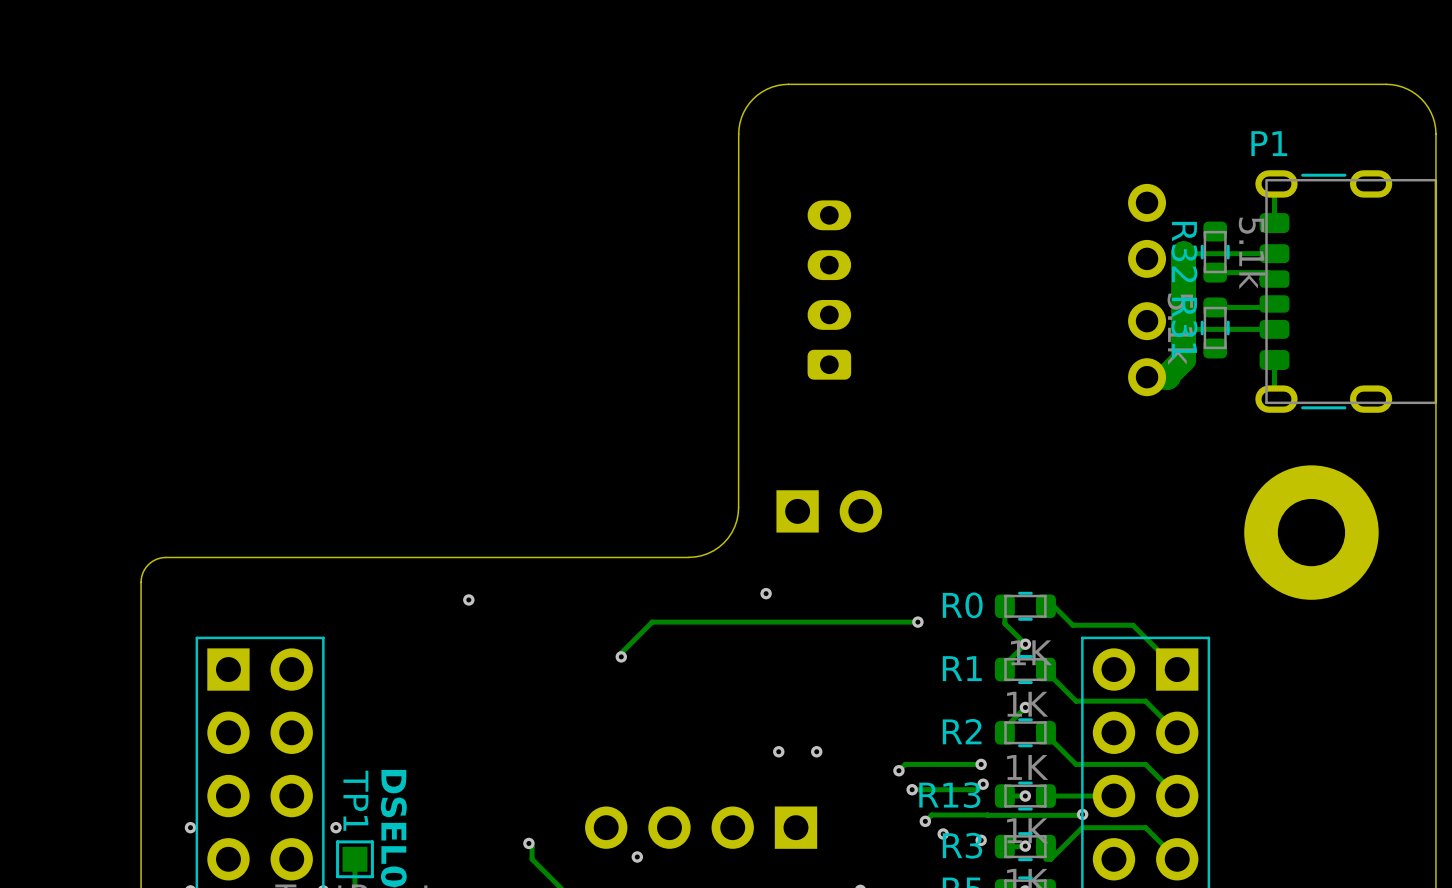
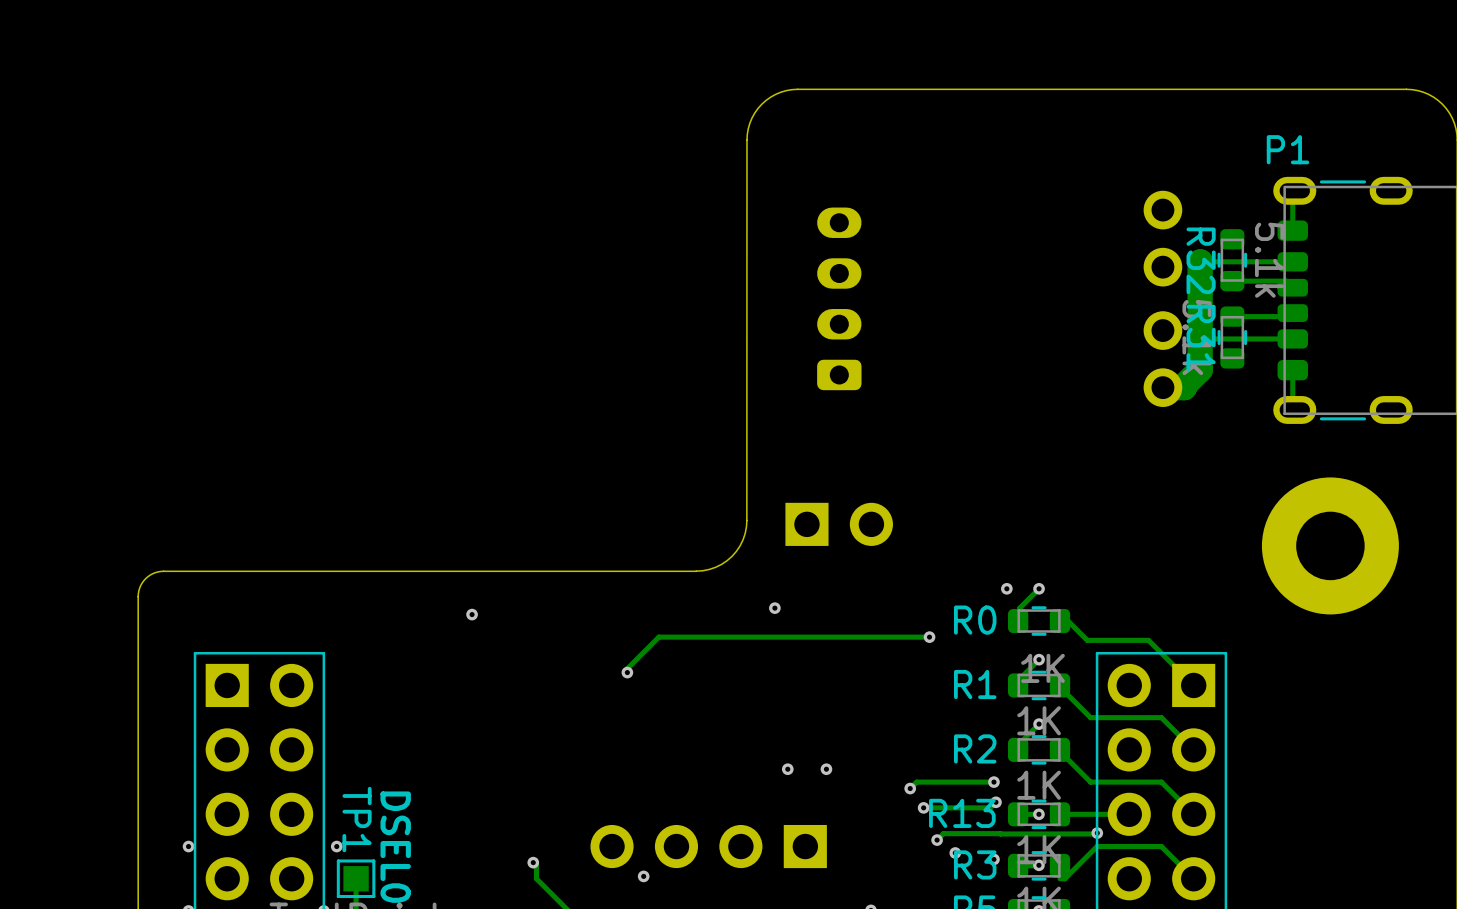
via: none -> (1006, 588)
track: none -> (1039, 588) (1019, 608) (1019, 614)
via: none -> (1039, 588)
track: (1004, 606) (1004, 623) (1025, 644) -> none

